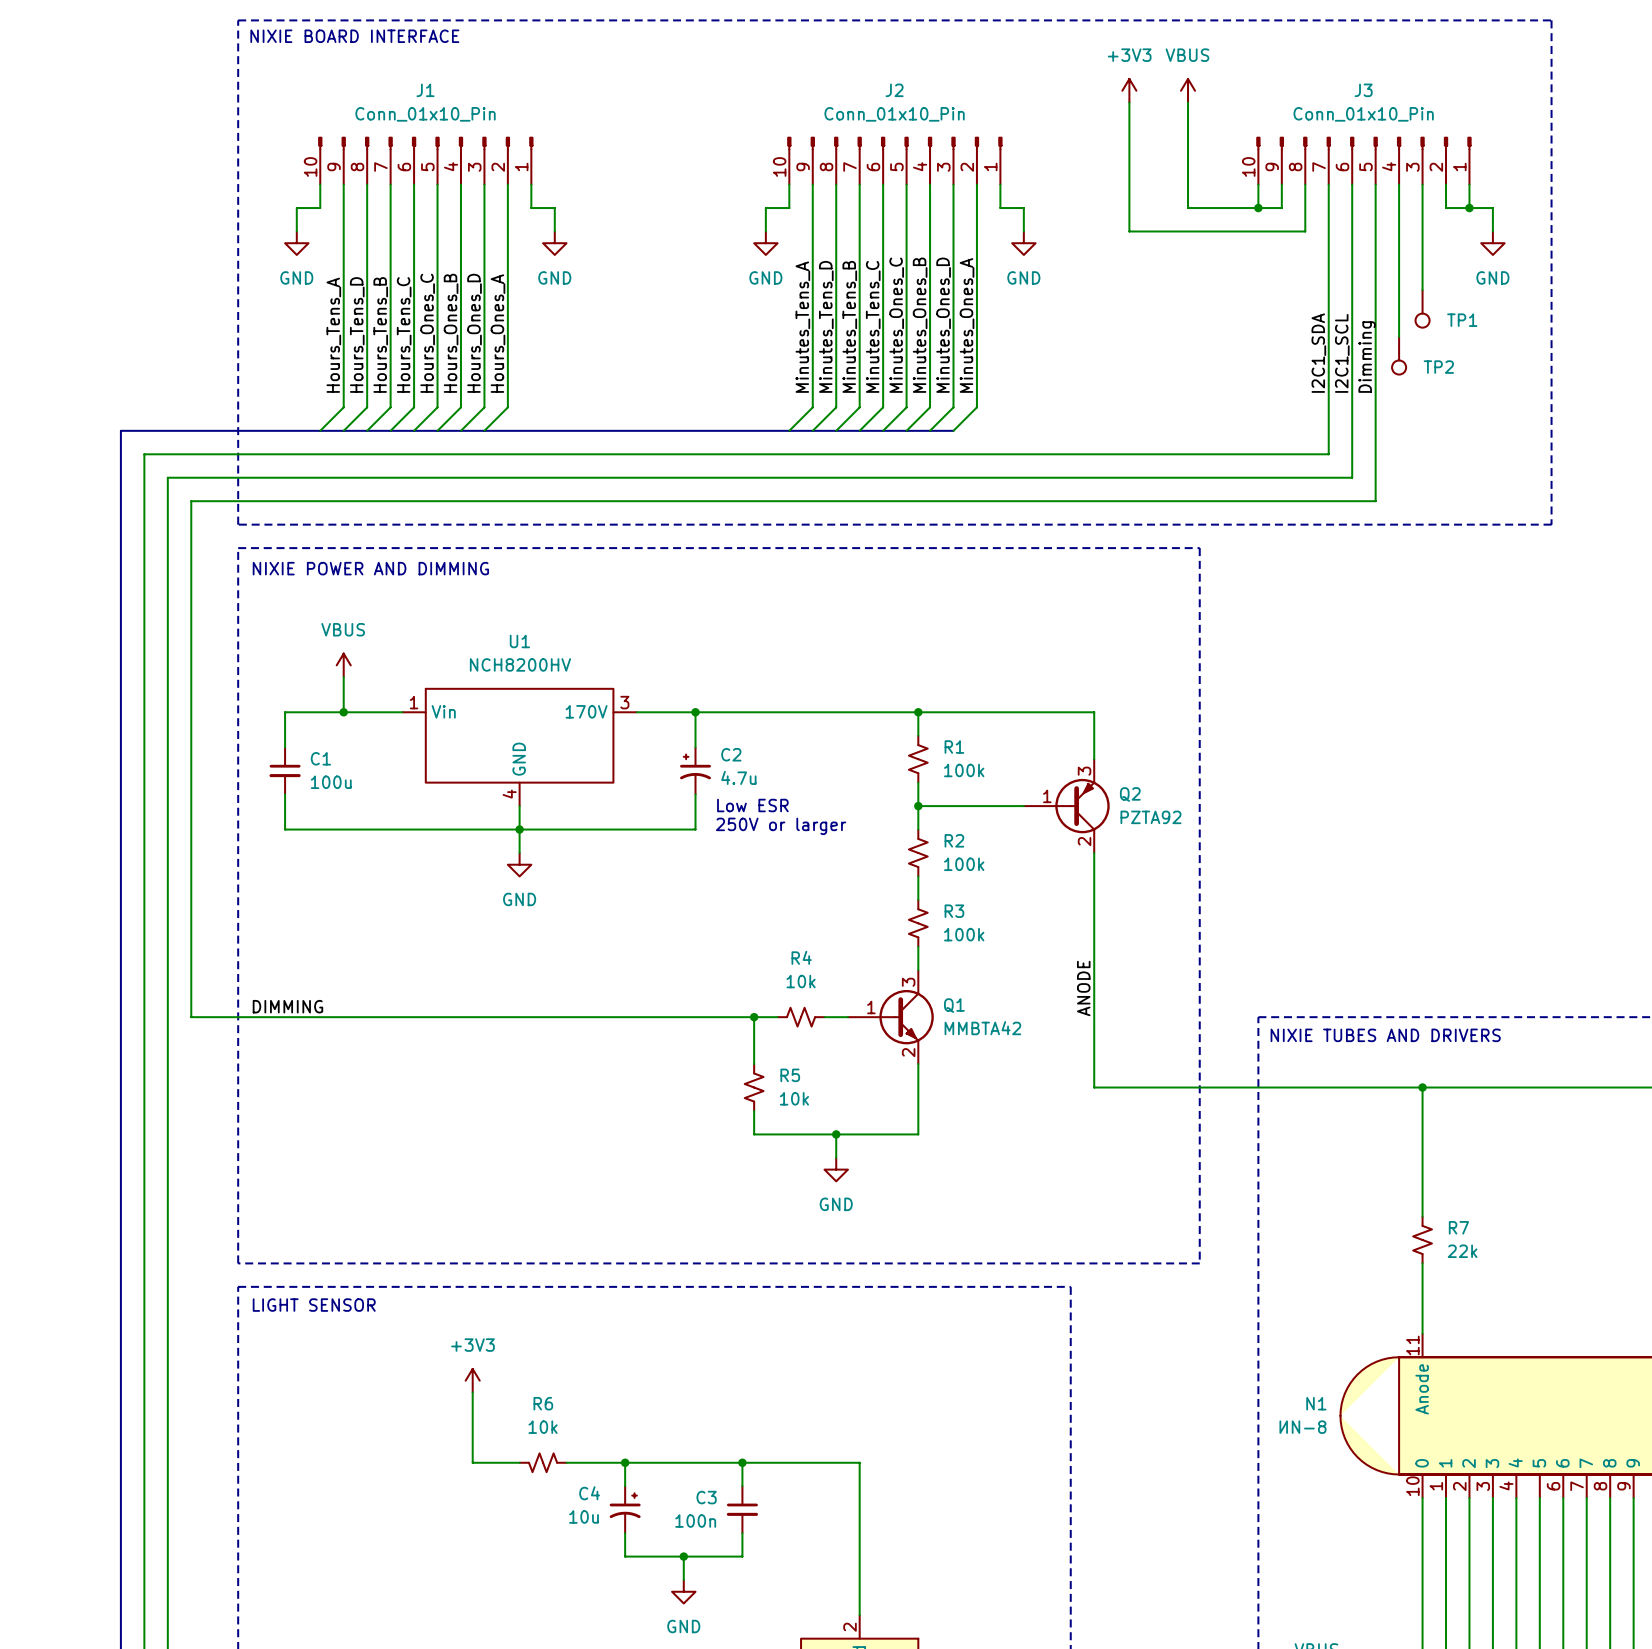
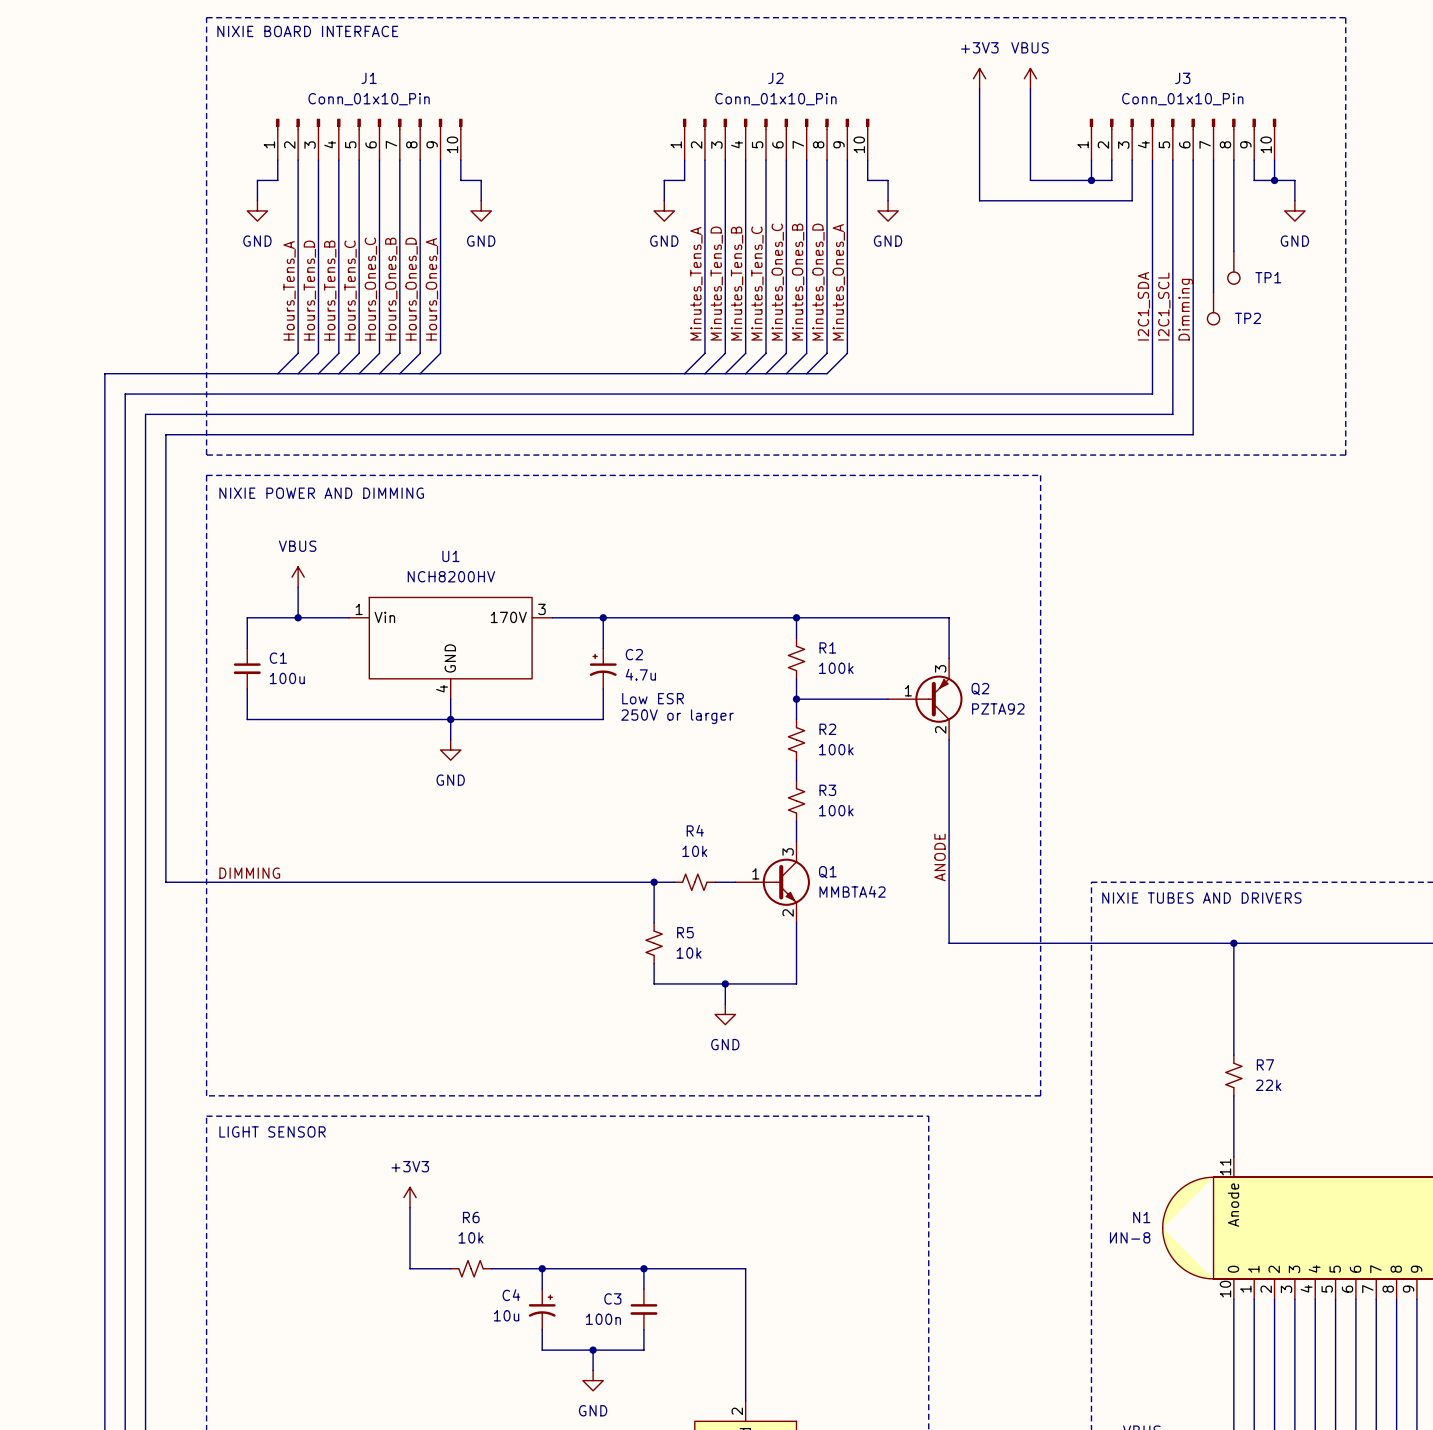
J1 flip: as is (425, 143) -> left-right (369, 124)
J2 flip: as is (894, 143) -> left-right (776, 124)
J3 flip: as is (1363, 143) -> left-right (1183, 124)
N1 pin number: none -> 5 (1327, 1289)

